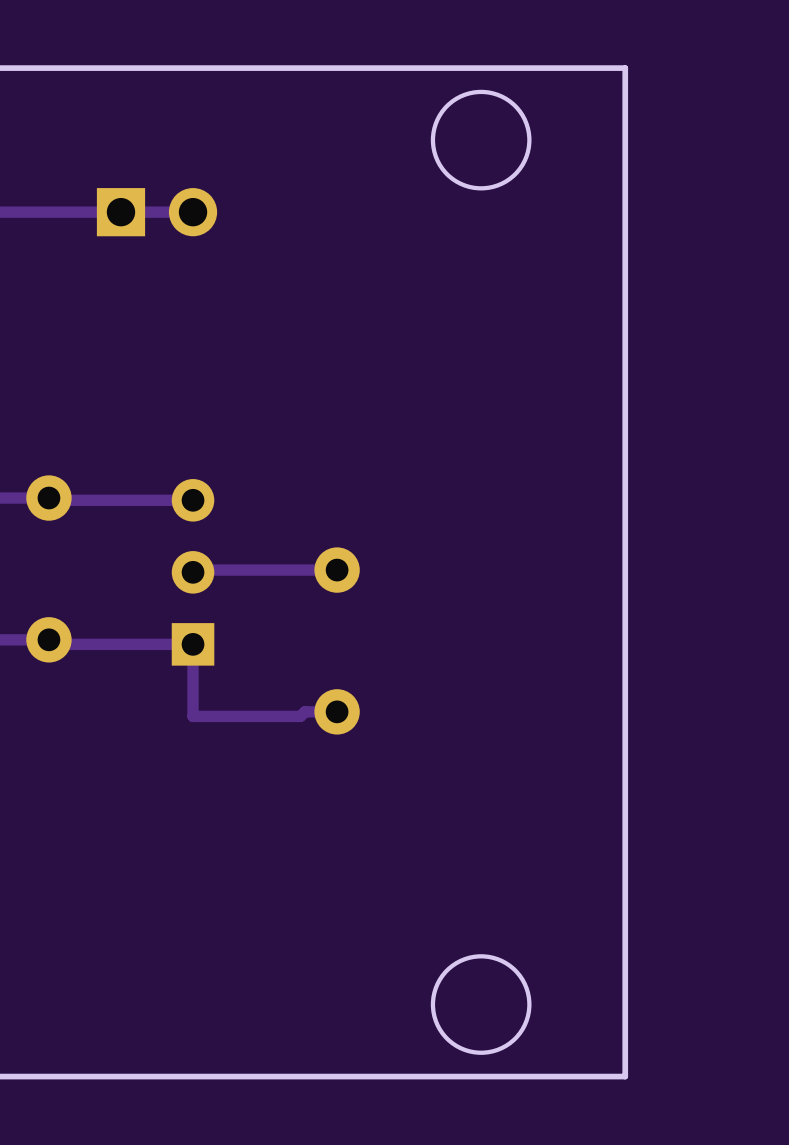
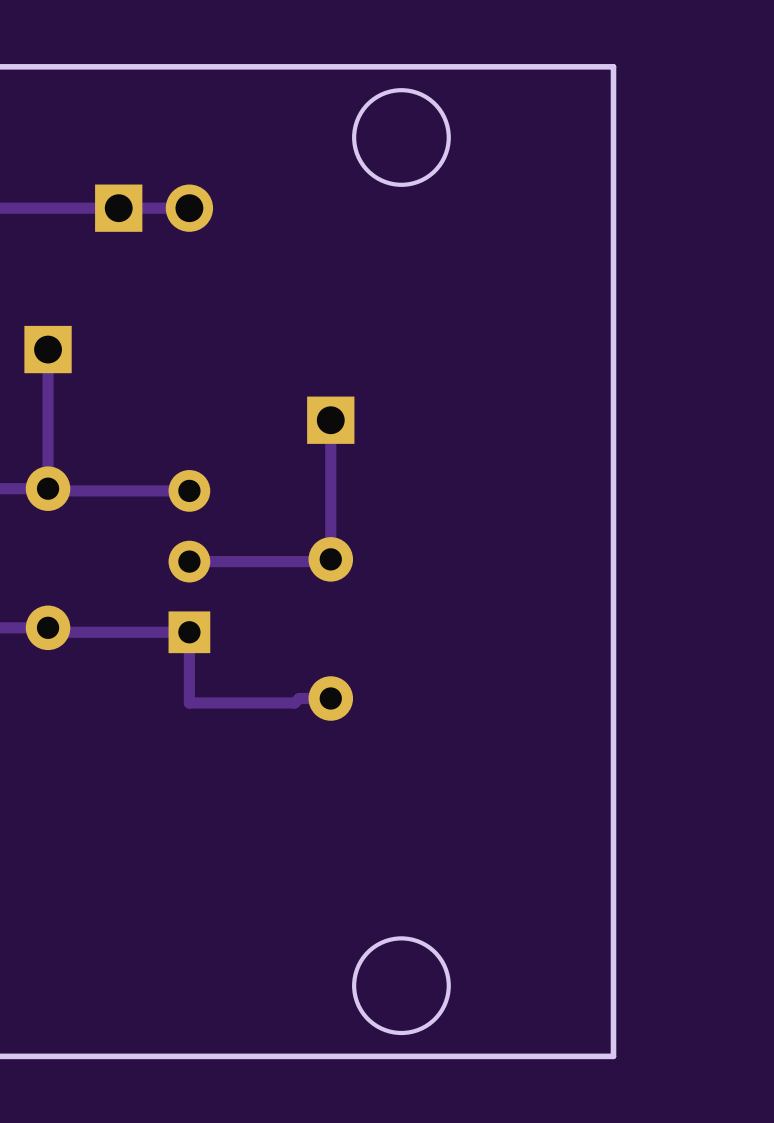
round board edge position: (481, 140) -> (401, 137)
track: none -> (48, 349) (48, 488)
part: none -> (48, 349)
part: none -> (330, 420)
track: (337, 570) (195, 570) (193, 572) -> (330, 420) (330, 559) (328, 561) (189, 561)
round board edge position: (481, 1004) -> (401, 985)

